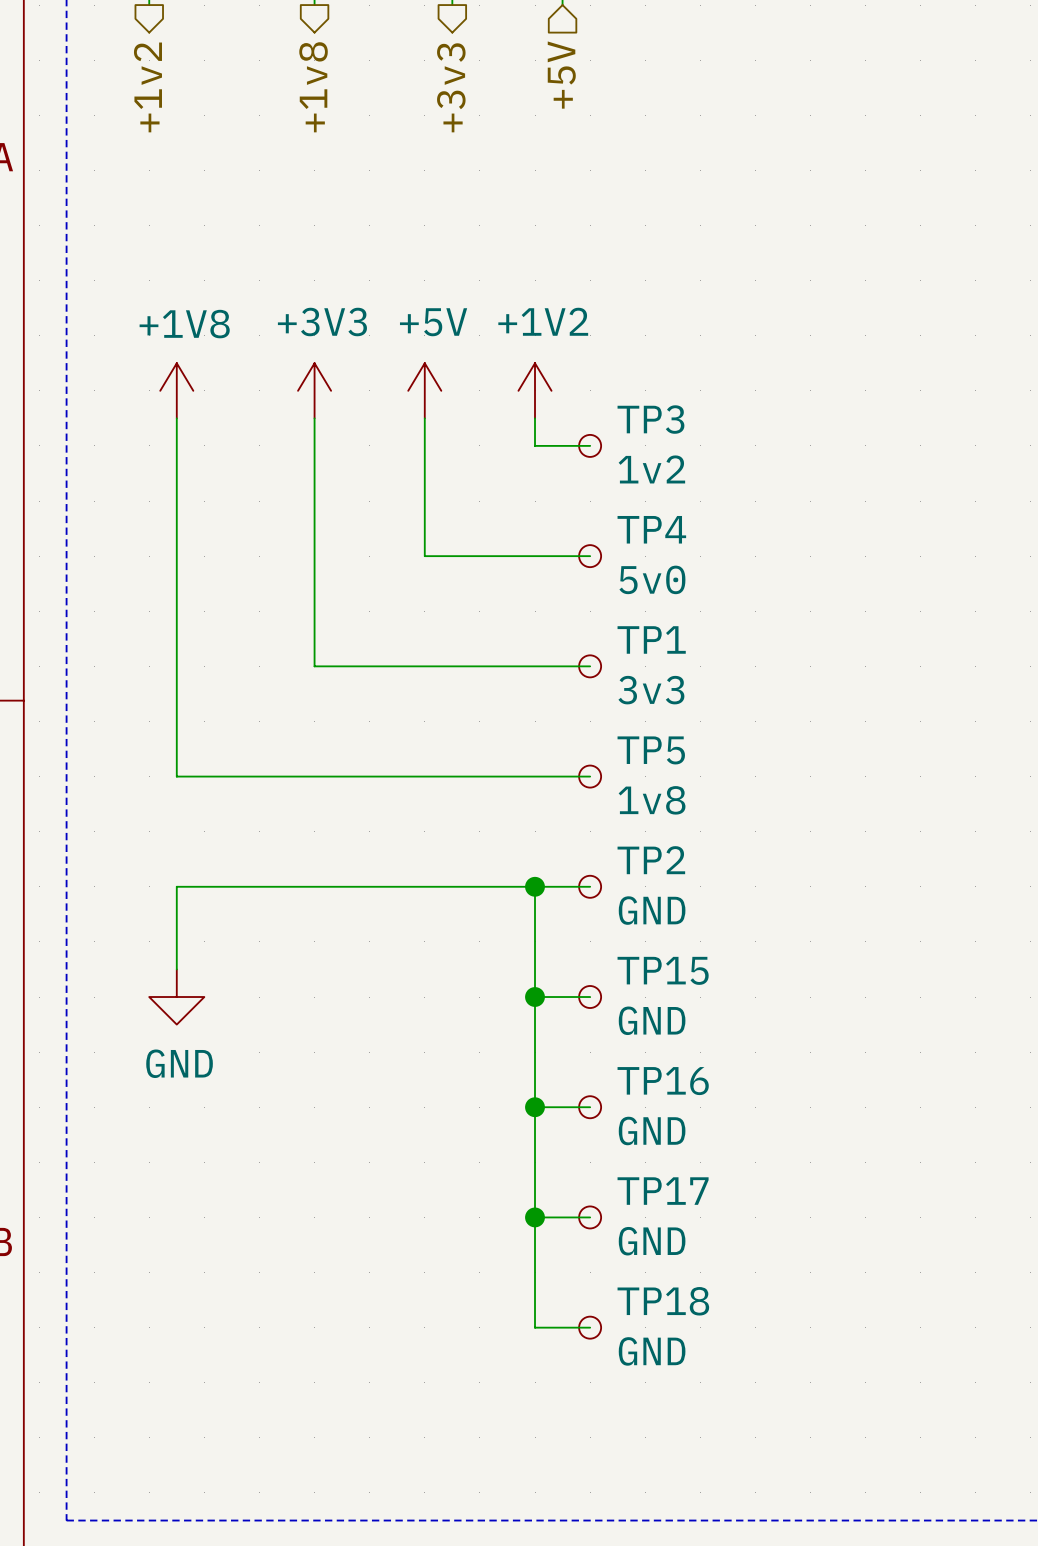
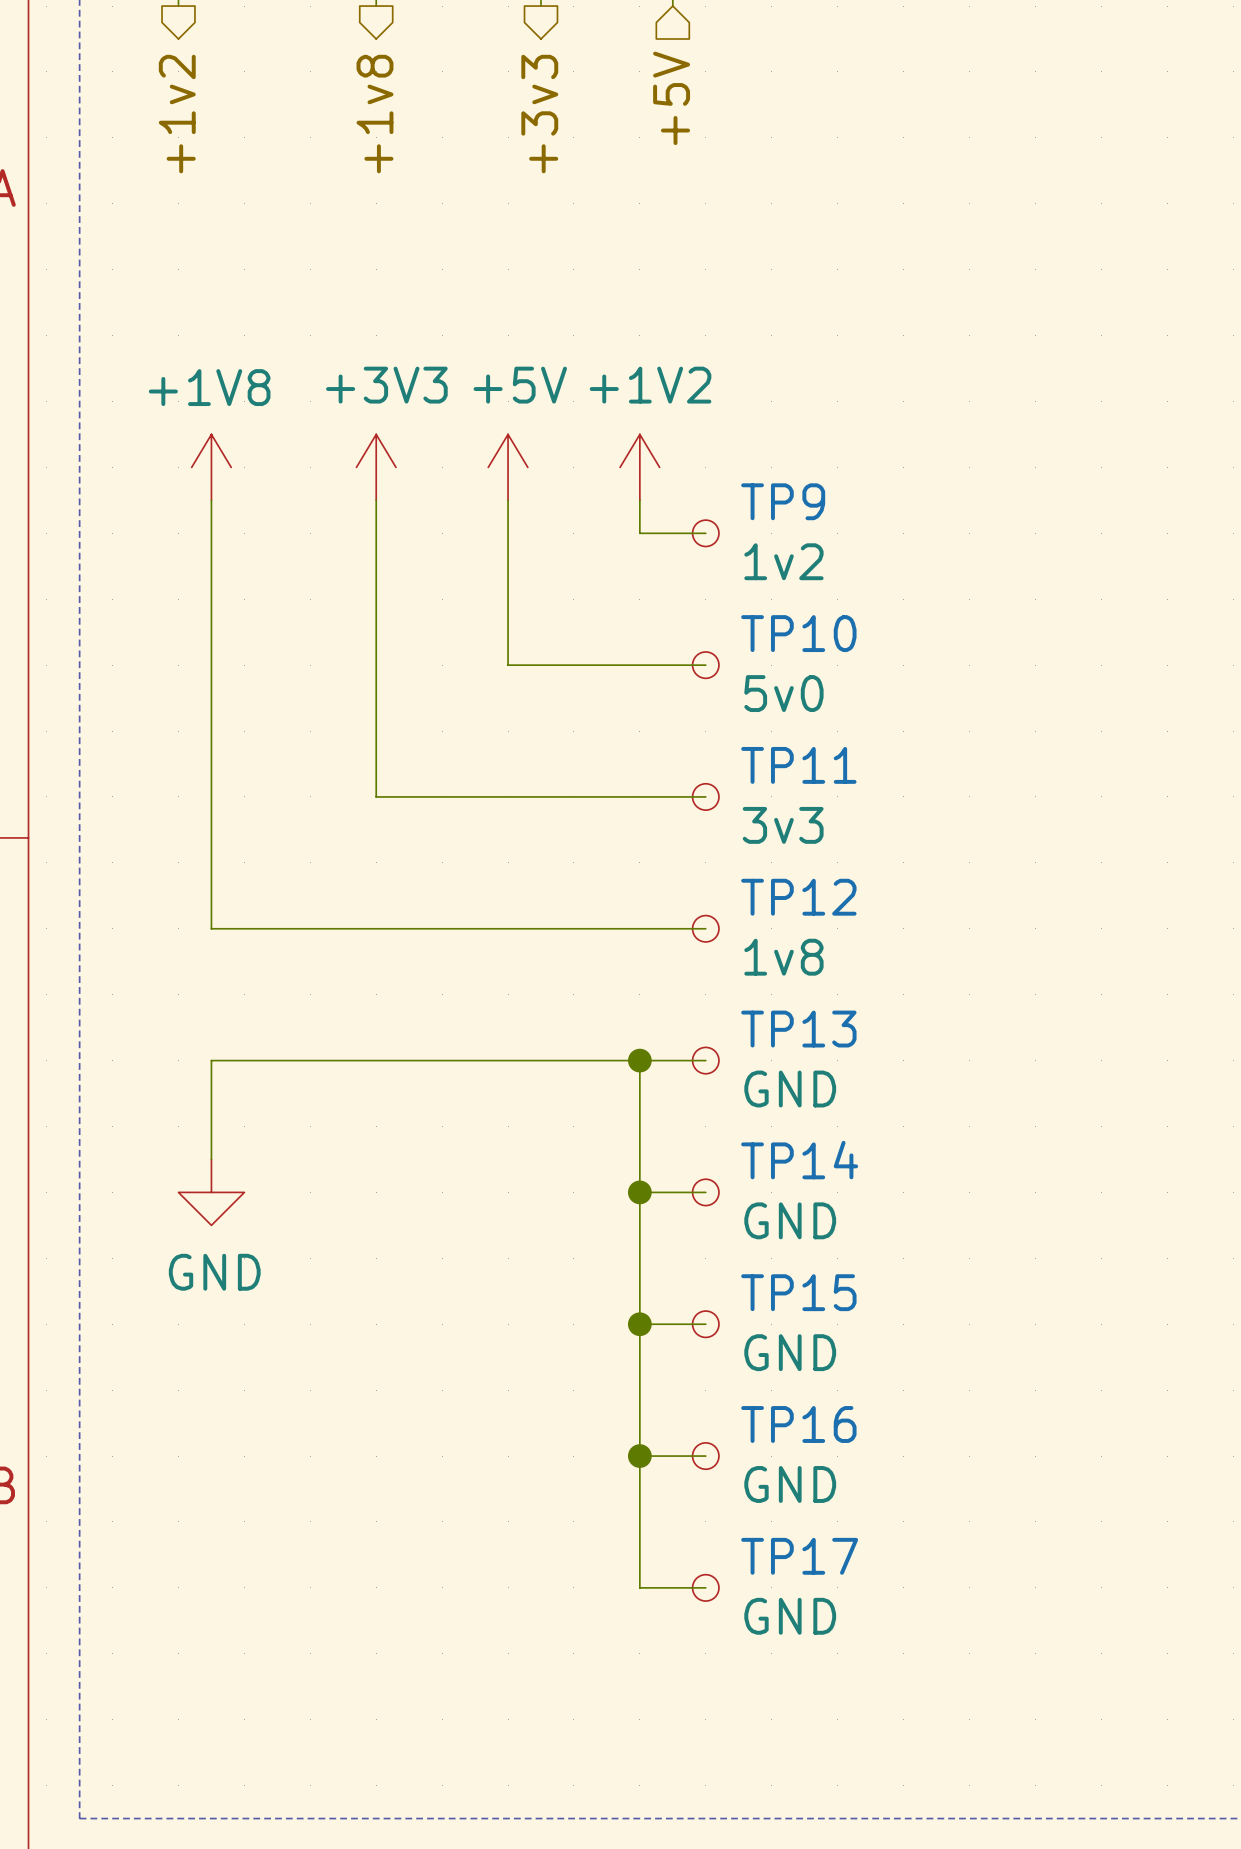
TP3 name: TP3 (650, 419) -> TP9 (783, 501)
TP4 name: TP4 (651, 529) -> TP10 (798, 633)
TP1 name: TP1 (651, 639) -> TP11 (798, 765)
TP5 name: TP5 (651, 750) -> TP12 (798, 897)
TP2 name: TP2 (651, 860) -> TP13 (798, 1029)
TP15 name: TP15 (663, 970) -> TP14 (799, 1160)
TP16 name: TP16 (663, 1081) -> TP15 (798, 1292)
TP17 name: TP17 (663, 1191) -> TP16 (798, 1424)
TP18 name: TP18 (663, 1301) -> TP17 (799, 1556)

